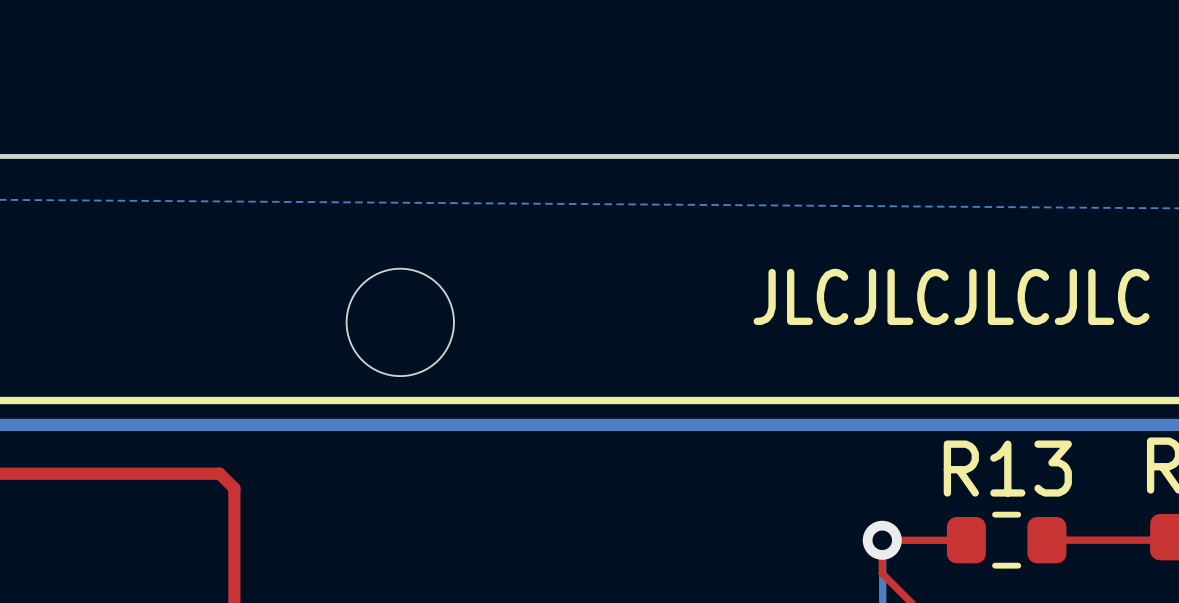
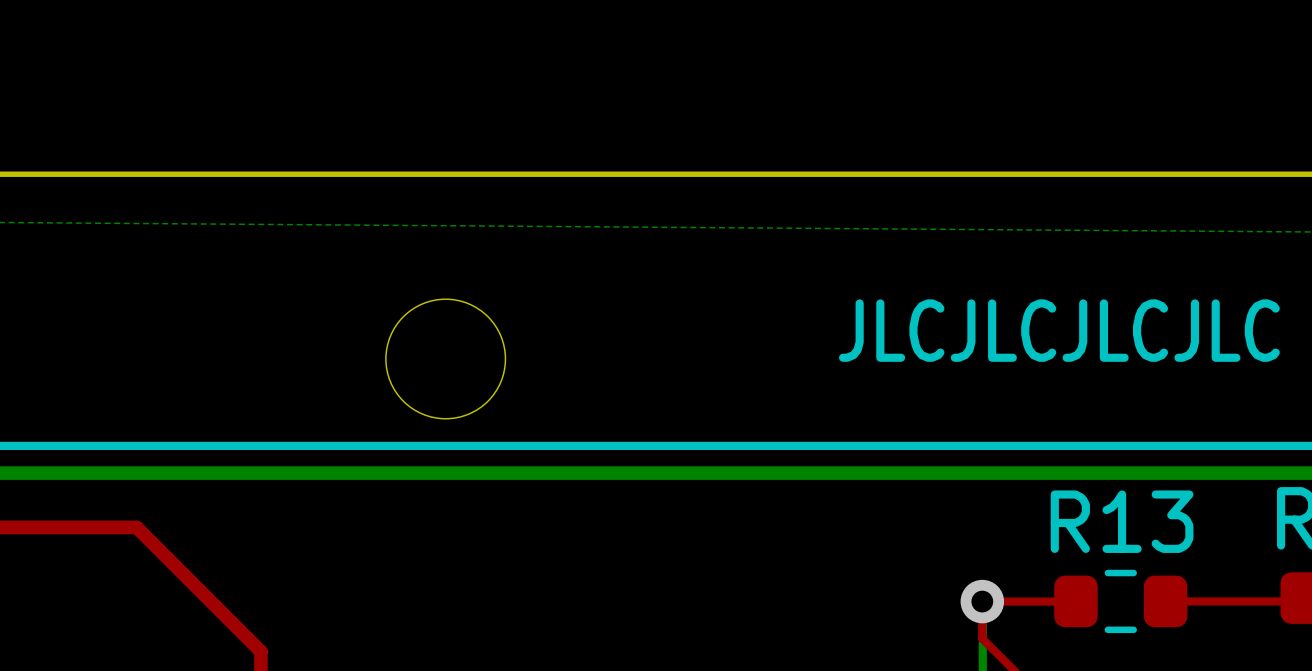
top track: (122, 473) (219, 473) (234, 488) (234, 585) -> (136, 527) (260, 651)

